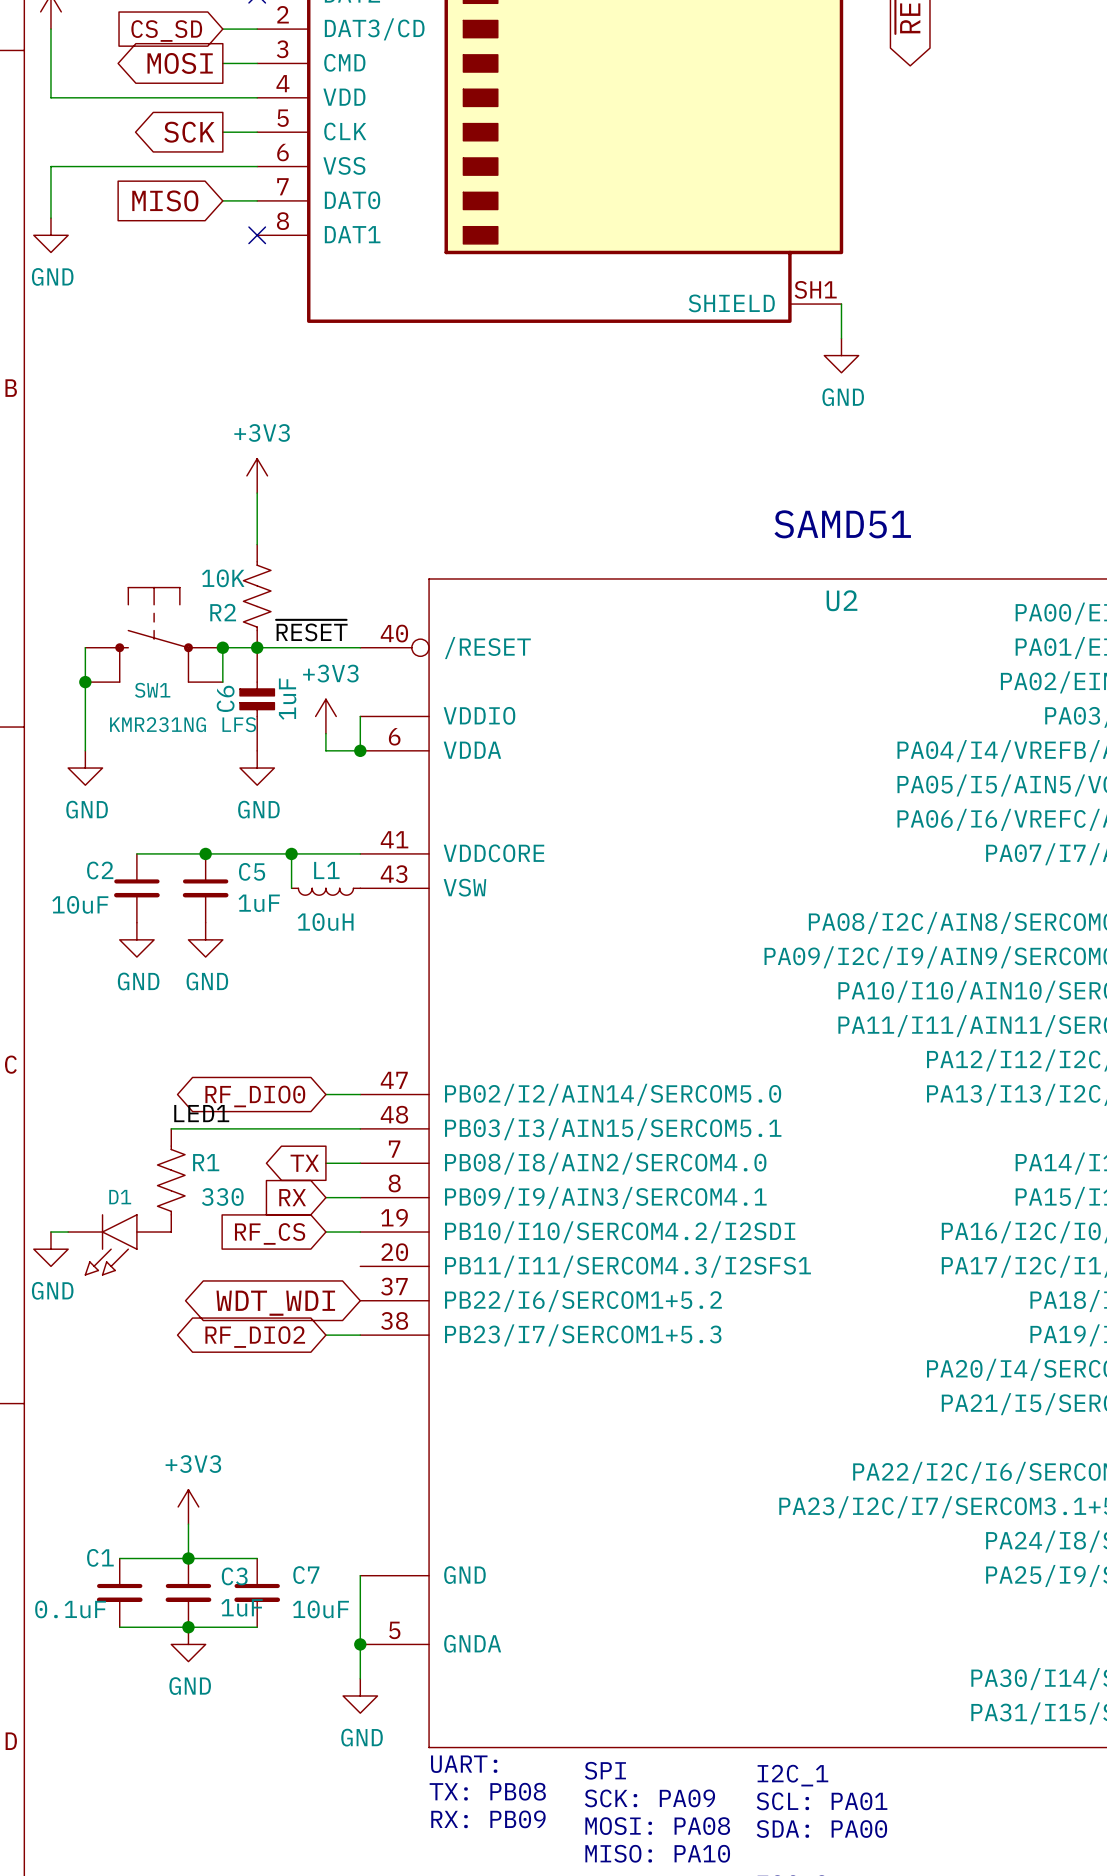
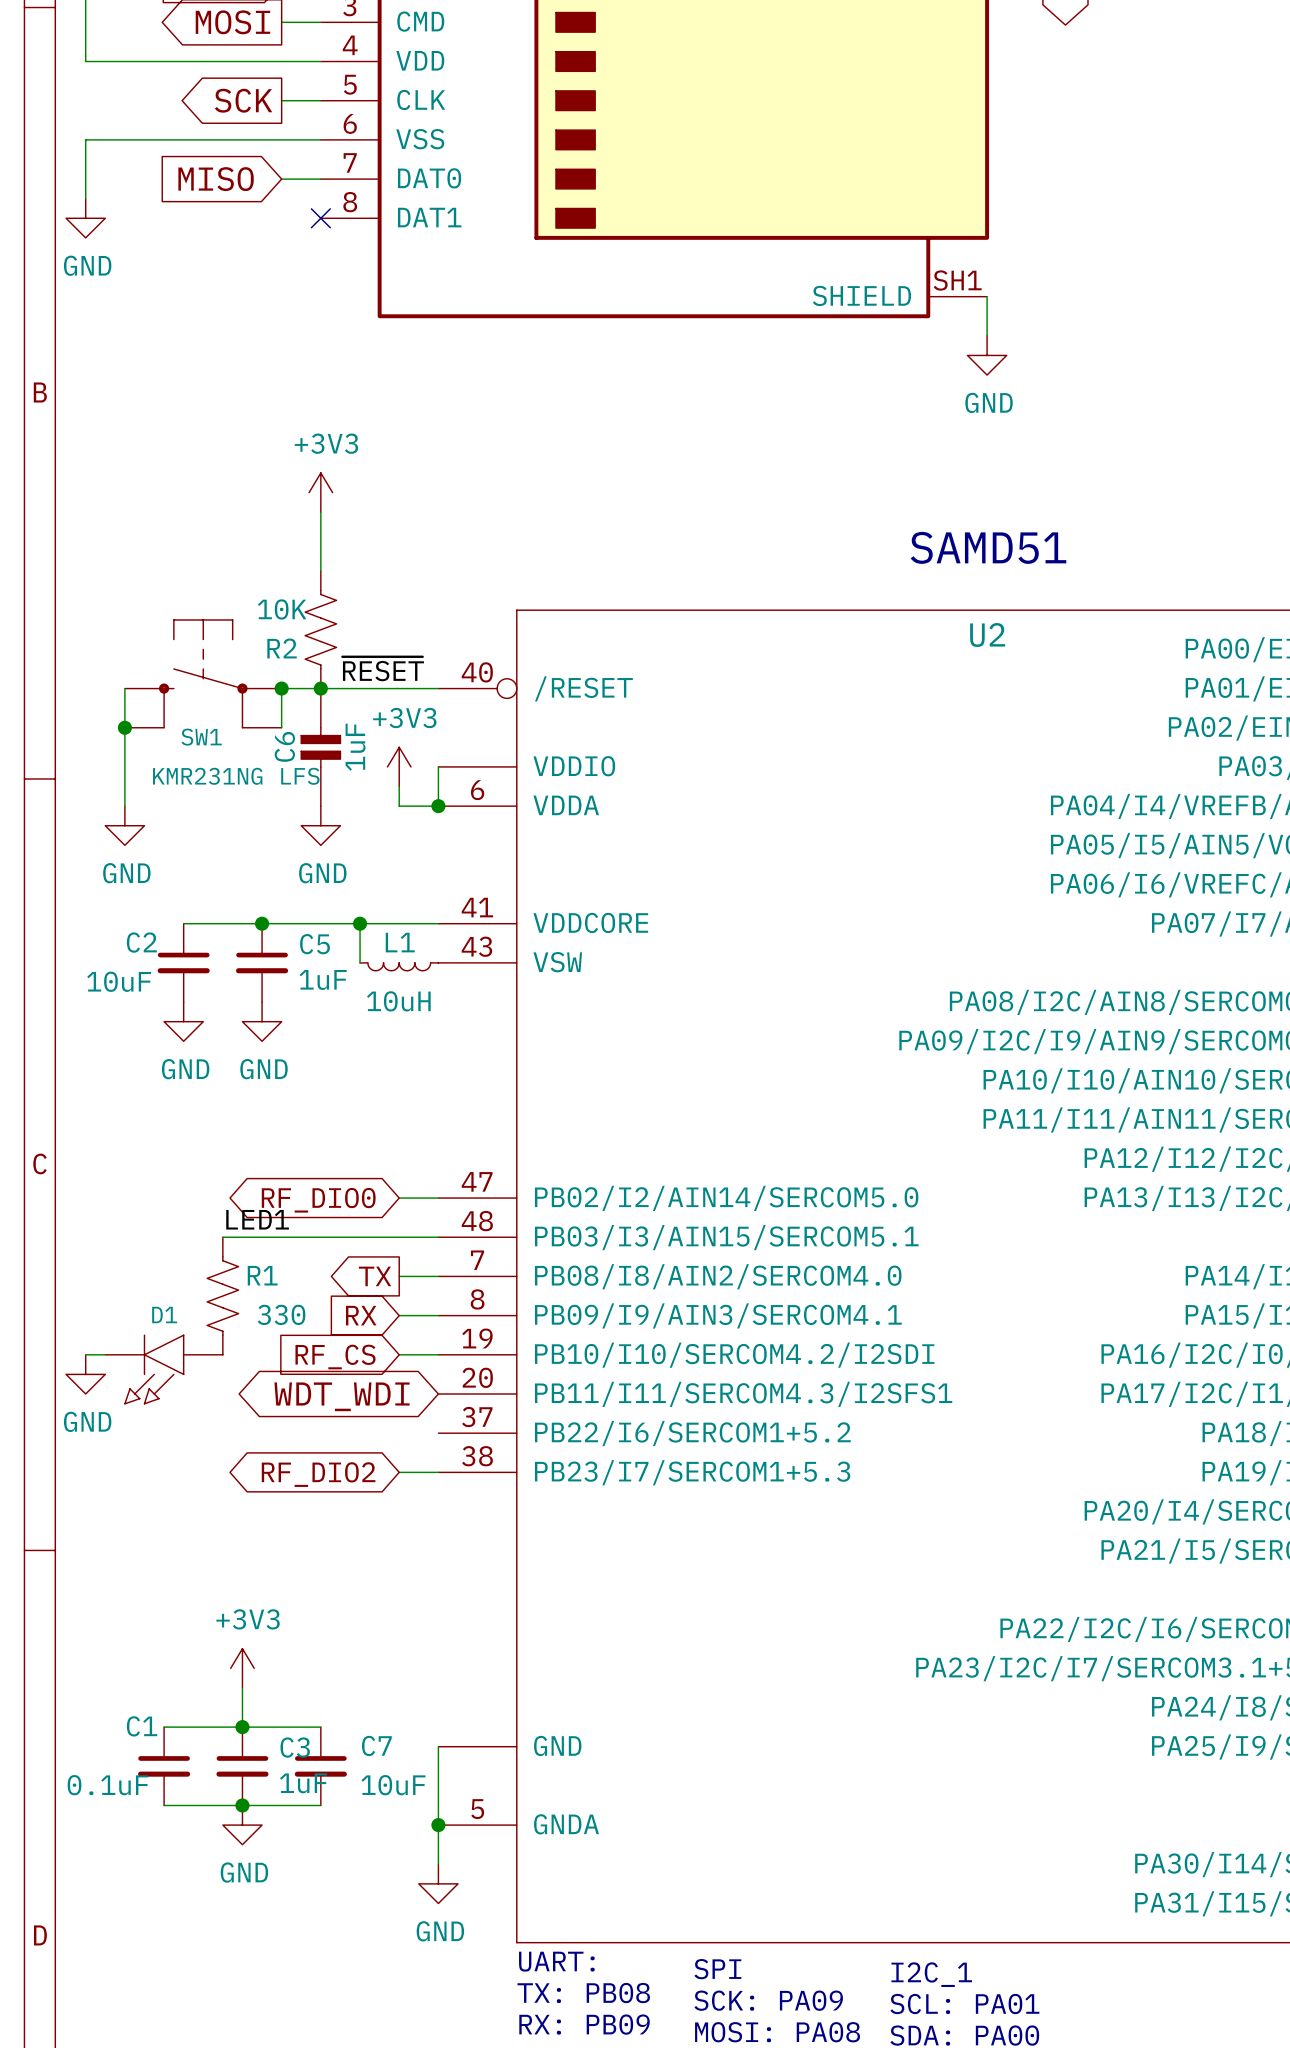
global label position: WDT_WDI (275, 1303) -> WDT_WDI (342, 1396)

